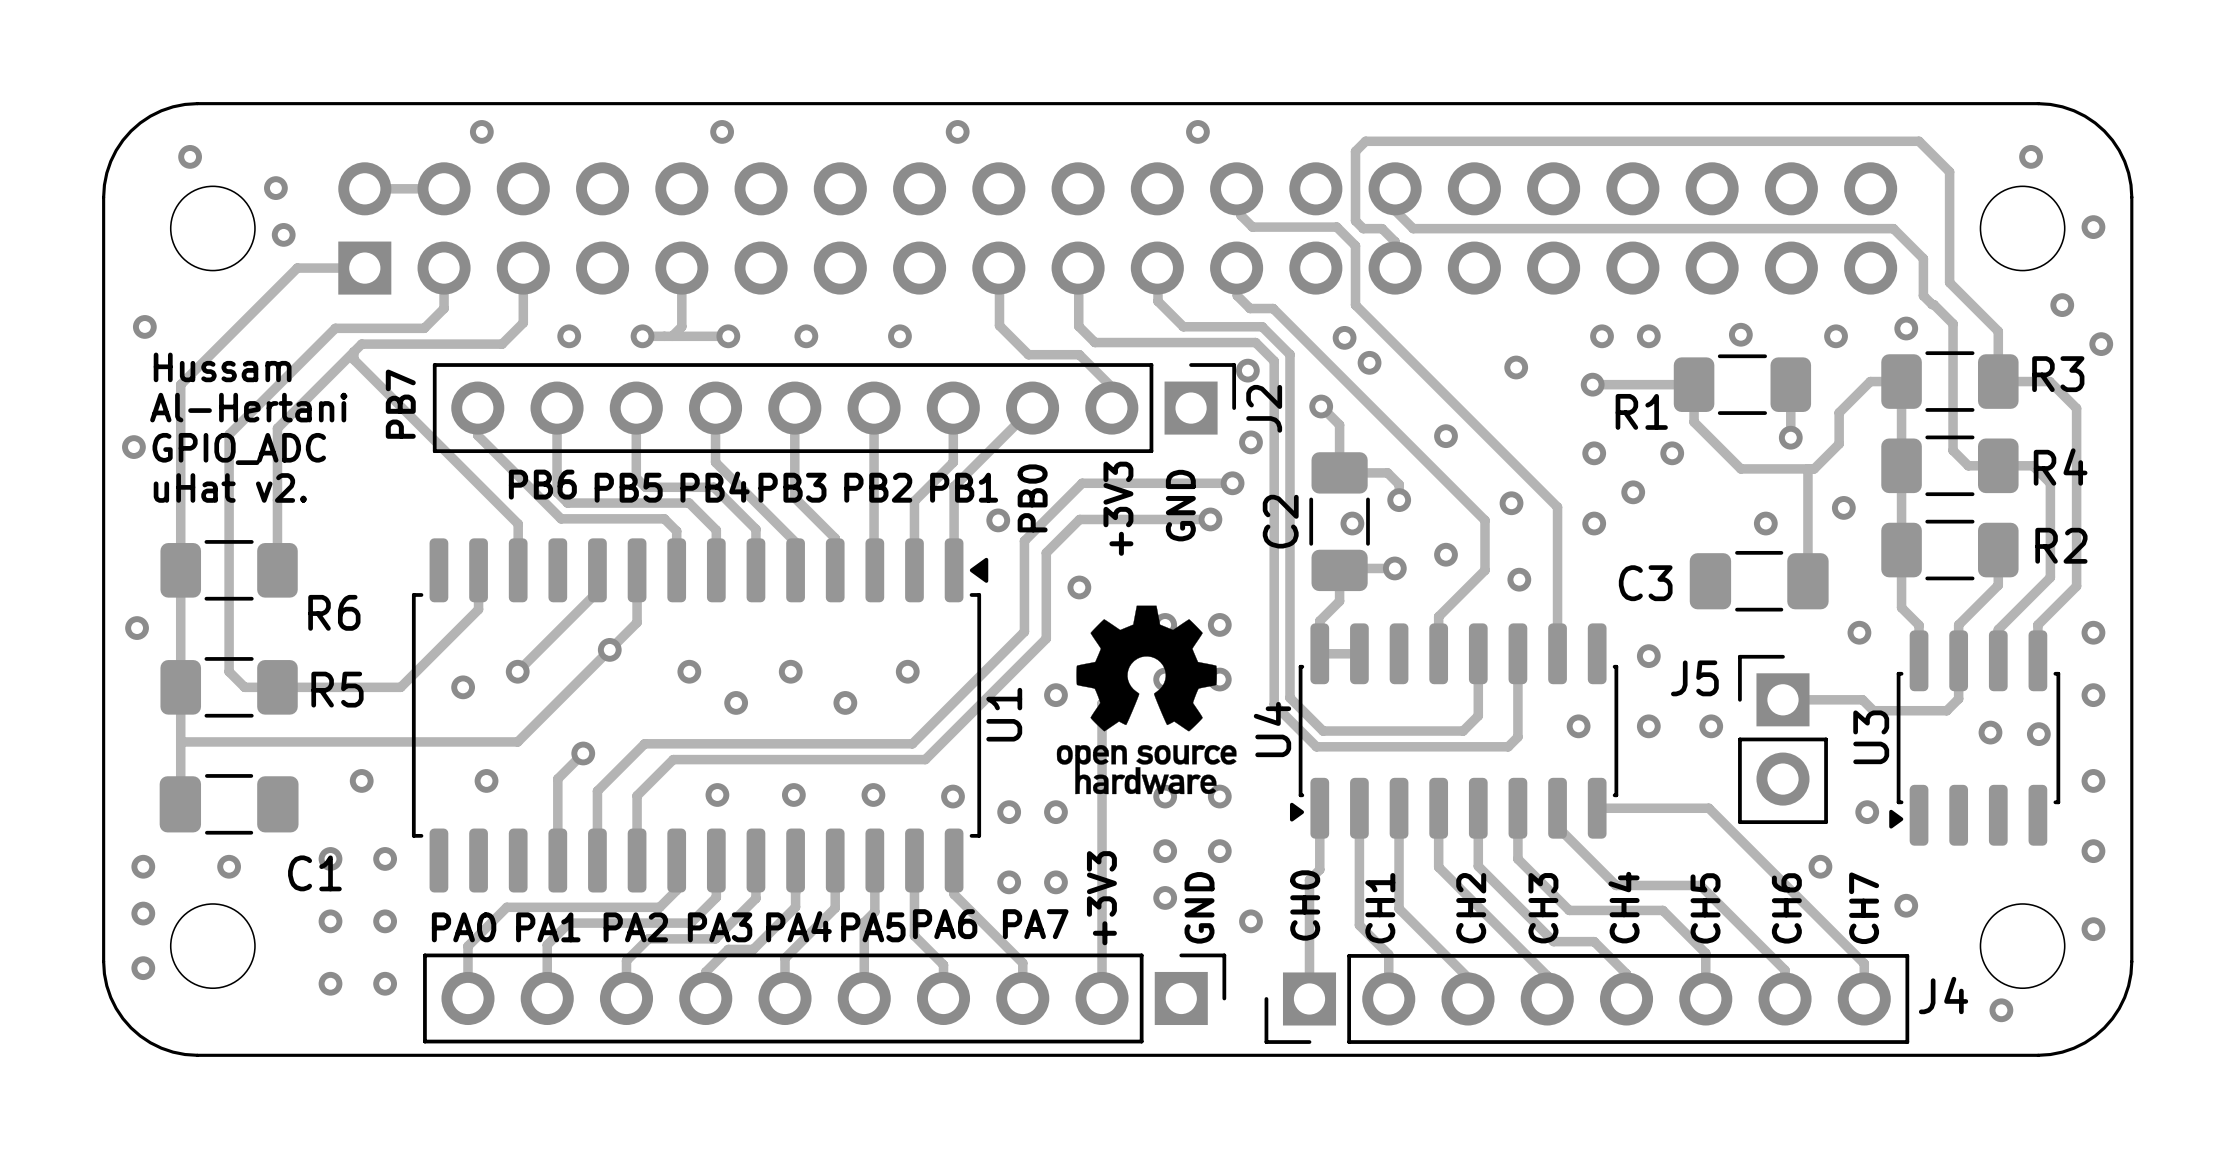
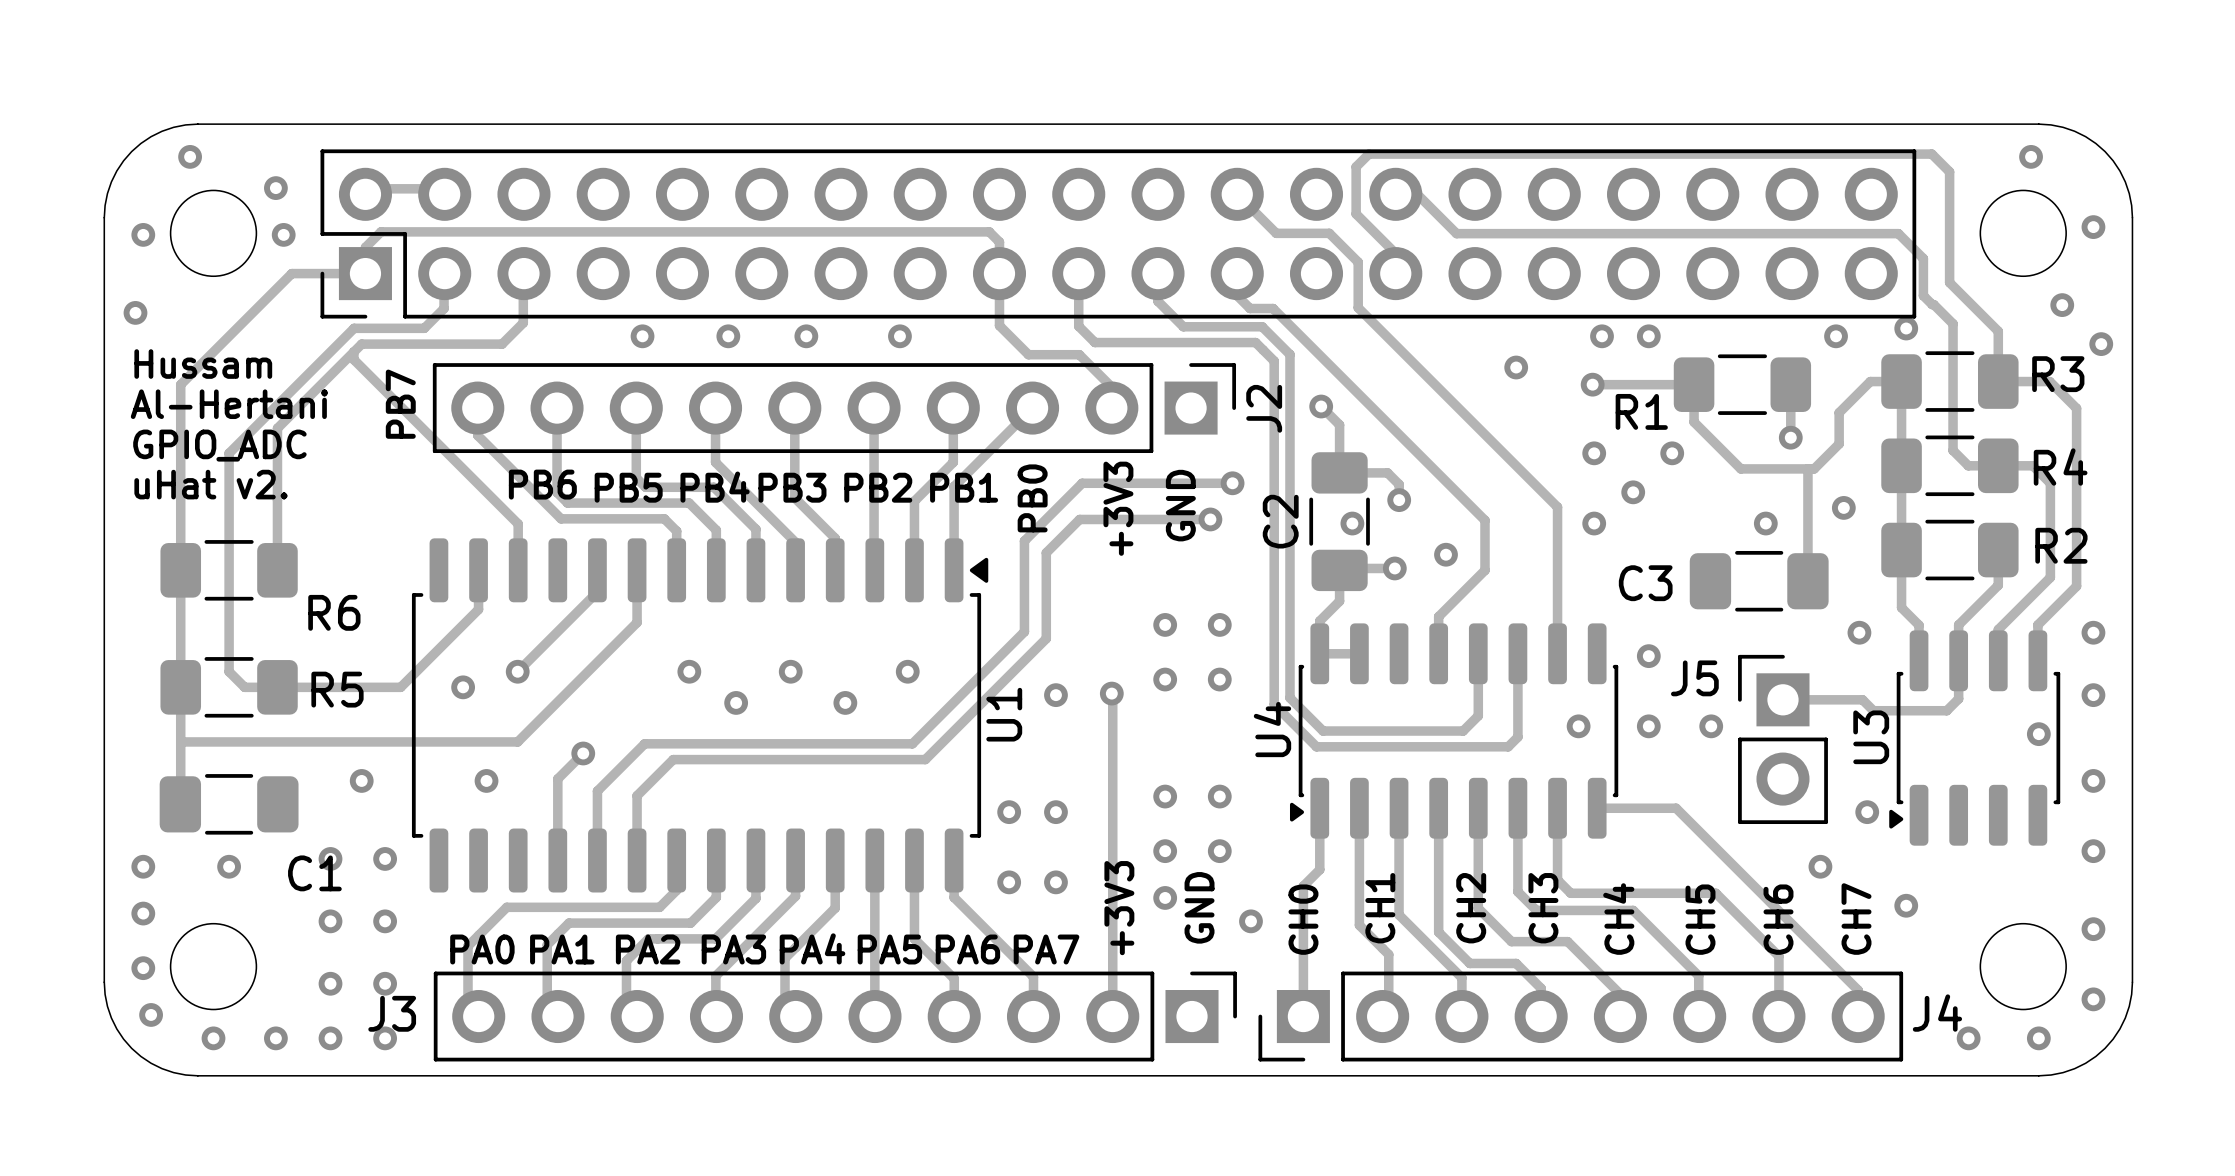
part footprint: [102, 102, 2134, 1057] -> [103, 123, 2134, 1077]
via: (481, 131) -> none
via: (722, 131) -> none
via: (957, 131) -> none
via: (1197, 131) -> none
track: (1931, 154) (1919, 141) (1365, 141) (1355, 151) (1355, 220) (1363, 228) (1382, 228) (1395, 241) (1395, 268) -> (1931, 154) (1368, 154) (1356, 166) (1356, 213) (1395, 253) (1395, 273)
track: (1395, 188) (1395, 210) (1413, 228) (1893, 228) (1898, 233) -> (1395, 194) (1417, 194) (1456, 233) (1898, 233)
track: (1241, 190) (1241, 215) (1252, 227) (1336, 227) (1355, 245) (1355, 305) (1358, 307) -> (1237, 194) (1276, 233) (1329, 233) (1358, 262) (1358, 307)
via: none -> (143, 234)
track: (364, 268) (297, 268) (291, 273) -> (999, 273) (999, 242) (989, 231) (381, 231) (365, 247) (365, 273) (291, 273)
track: (681, 268) (681, 326) (672, 336) -> none
via position: (144, 326) -> (135, 312)
track: (354, 328) (335, 328) (229, 434) (229, 453) -> (354, 328) (229, 453)
via: (1740, 334) -> none
via: (569, 336) -> none
track: (642, 336) (728, 336) -> none
via: (1344, 337) -> none
via: (1369, 362) -> none
text position: Hussam (222, 367) -> Hussam (203, 364)
via: (1247, 370) -> none
text position: Al-Hertani (248, 407) -> Al-Hertani (229, 404)
via: (1446, 436) -> none
via: (1250, 442) -> none
via: (133, 447) -> none
text position: GPIO_ADC (239, 448) -> GPIO_ADC (219, 445)
text position: uHat v2. (230, 487) -> uHat v2. (211, 484)
via: (1511, 503) -> none
via: (998, 520) -> none
via: (1519, 579) -> none
via: (1079, 587) -> none
drawing: [1056, 605, 1237, 795] -> none
via: (137, 628) -> none
via: (609, 649) -> none
track: (1111, 693) (1102, 703) (1102, 998) -> none
track: none -> (1112, 694) (1112, 1016)
via: (1990, 732) -> none
via: (717, 794) -> none
via: (793, 794) -> none
via: (873, 794) -> none
via: (953, 796) -> none
track: (1676, 808) (1708, 808) (1864, 963) (1864, 998) -> (1676, 808) (1858, 990) (1858, 1016)
track: (1557, 826) (1616, 885) (1700, 885) (1785, 970) (1785, 998) -> (1557, 826) (1557, 880) (1570, 893) (1715, 893) (1778, 956) (1778, 1016)
track: (1517, 859) (1569, 910) -> (1517, 859) (1517, 891) (1536, 910) (1569, 910)
track: (1478, 866) (1553, 941) -> (1478, 866) (1478, 908) (1511, 941) (1553, 941)
track: (1438, 867) (1547, 975) (1547, 998) -> (1438, 867) (1438, 932) (1469, 963) (1516, 963) (1541, 988) (1541, 1016)
track: (1309, 880) (1309, 998) -> (1309, 880) (1303, 886) (1303, 1016)
track: (954, 894) (1022, 963) (1022, 998) -> (954, 894) (954, 897) (1033, 976) (1033, 1016)
track: (795, 896) (795, 907) (753, 949) (728, 949) (705, 972) (705, 998) -> (795, 896) (715, 975) (716, 1016)
text position: +3V3 (1101, 898) -> +3V3 (1119, 908)
text position: CH0 (1305, 905) -> CH0 (1303, 919)
text position: CH4 (1623, 907) -> CH4 (1618, 919)
track: (1399, 908) (1468, 977) (1468, 998) -> (1399, 908) (1399, 914) (1461, 977) (1461, 1016)
text position: CH5 (1705, 908) -> CH5 (1700, 919)
text position: CH6 (1786, 908) -> CH6 (1778, 919)
text position: CH7 (1864, 908) -> CH7 (1856, 919)
track: (1633, 910) (1662, 910) (1705, 953) (1705, 998) -> (1633, 910) (1698, 975) (1699, 1016)
track: (874, 911) (864, 922) (864, 998) -> (874, 911) (874, 1016)
text position: PA6 (945, 924) -> PA6 (967, 949)
text position: PA7 (1035, 924) -> PA7 (1046, 949)
text position: PA4 (798, 926) -> PA4 (812, 948)
text position: PA0 (464, 927) -> PA0 (482, 949)
text position: PA1 (548, 927) -> PA1 (562, 949)
text position: PA2 (635, 927) -> PA2 (648, 949)
text position: PA3 (720, 927) -> PA3 (733, 949)
text position: PA5 (873, 927) -> PA5 (889, 949)
track: (914, 935) (943, 964) (943, 998) -> (914, 935) (914, 938) (954, 978) (954, 1016)
track: (1567, 941) (1594, 941) (1626, 973) (1626, 998) -> (1567, 941) (1620, 994) (1620, 1016)
J3 position: (824, 998) -> (835, 1016)
J4 position: (1586, 998) -> (1580, 1016)
via: none -> (2093, 999)
via: (2001, 1010) -> none
J3 name: none -> J3 (392, 1013)
via: none -> (151, 1014)
via: none -> (213, 1038)
via: none -> (275, 1038)
via: none -> (330, 1038)
via: none -> (385, 1038)
via: none -> (1968, 1038)
via: none -> (2038, 1038)

